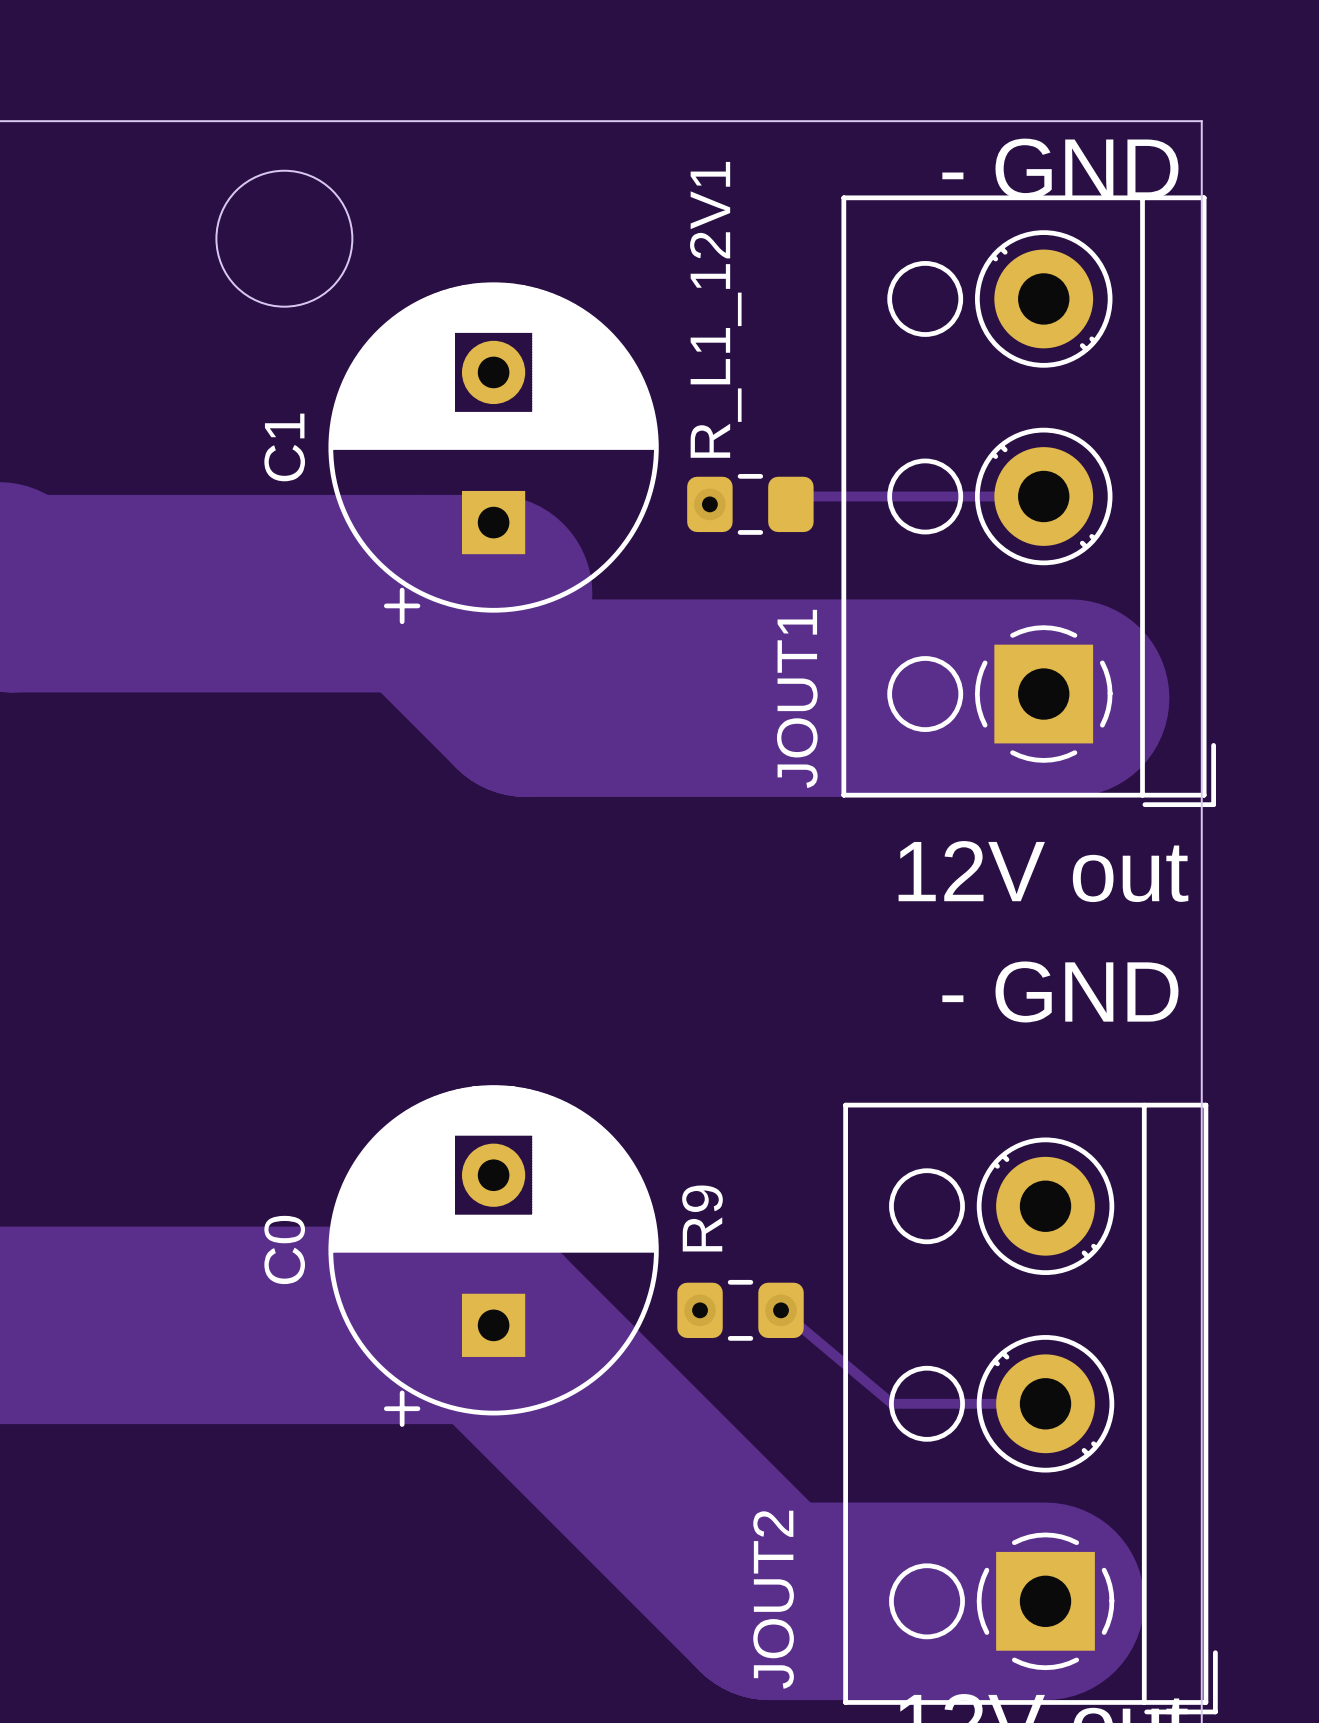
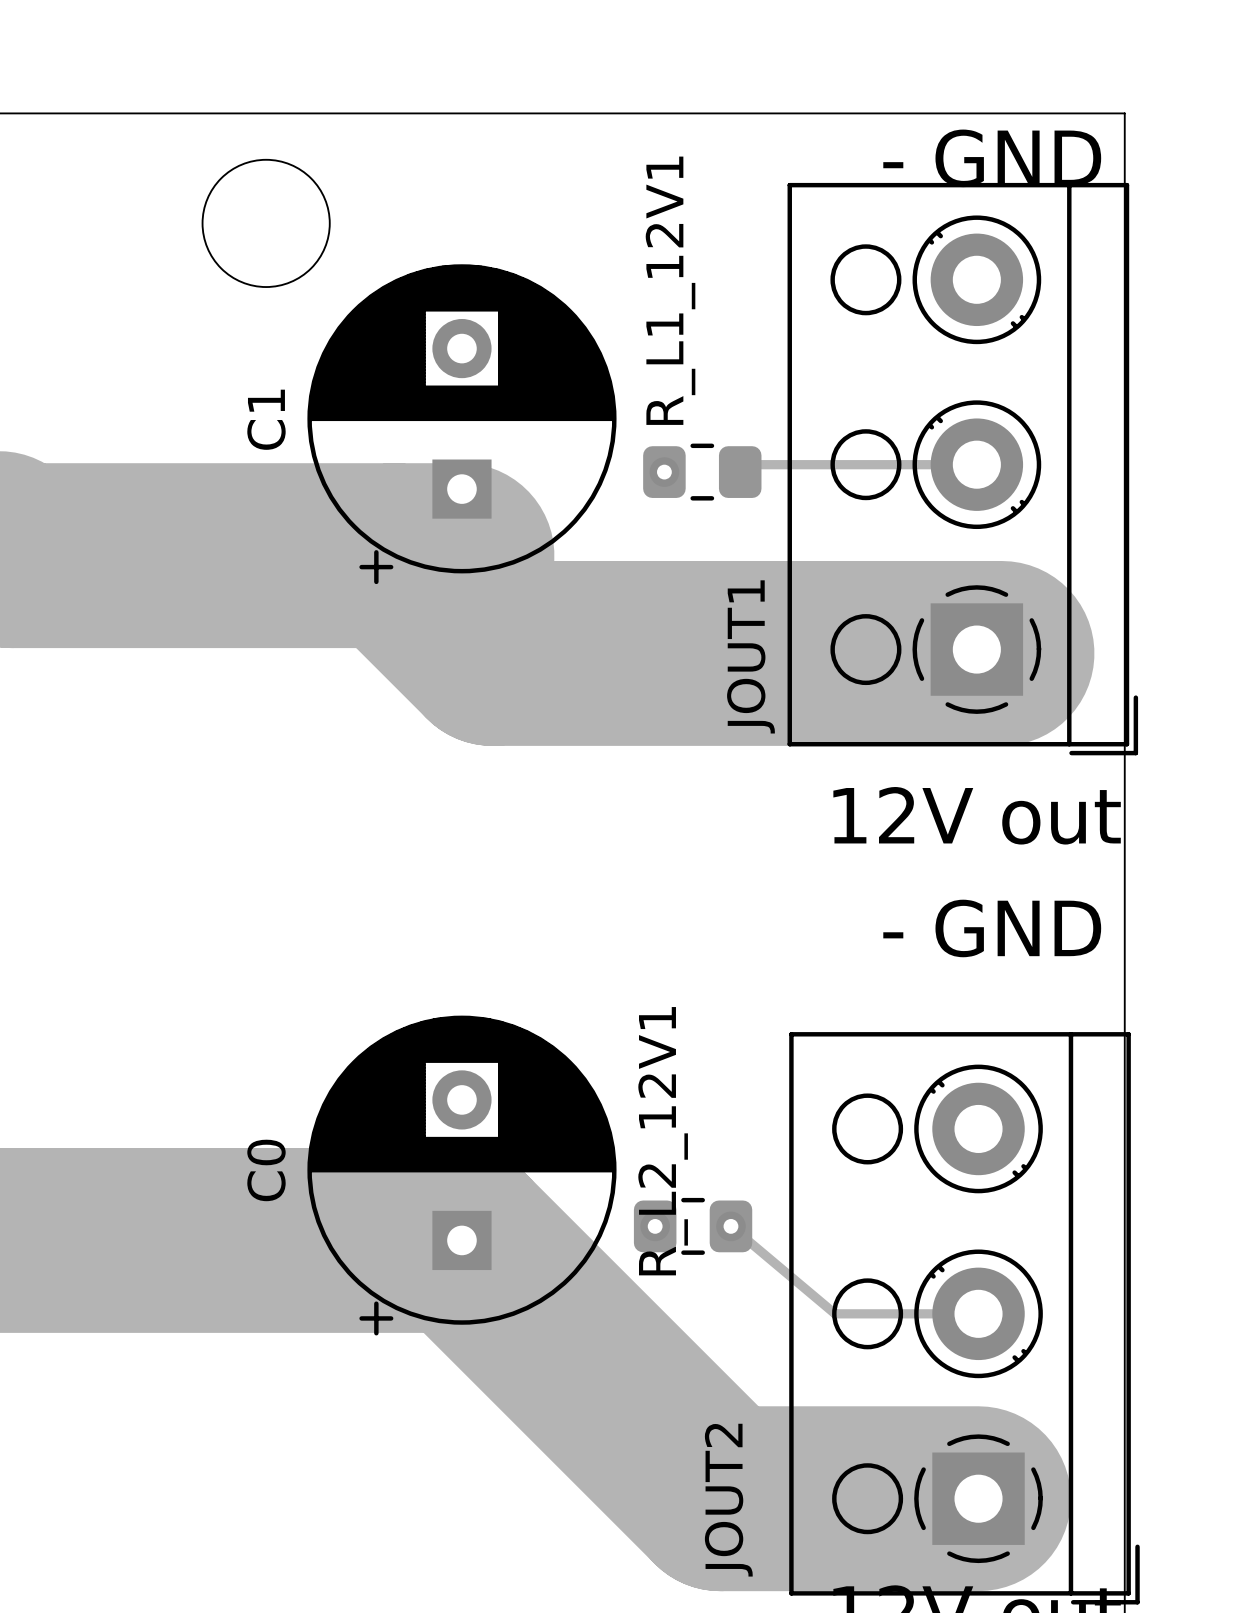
R9 name: R9 (702, 1218) -> R_L2_12V1 (663, 1141)

